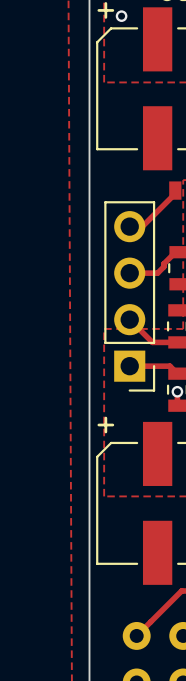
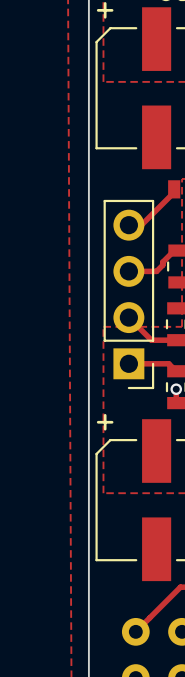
via: (121, 16) -> none

